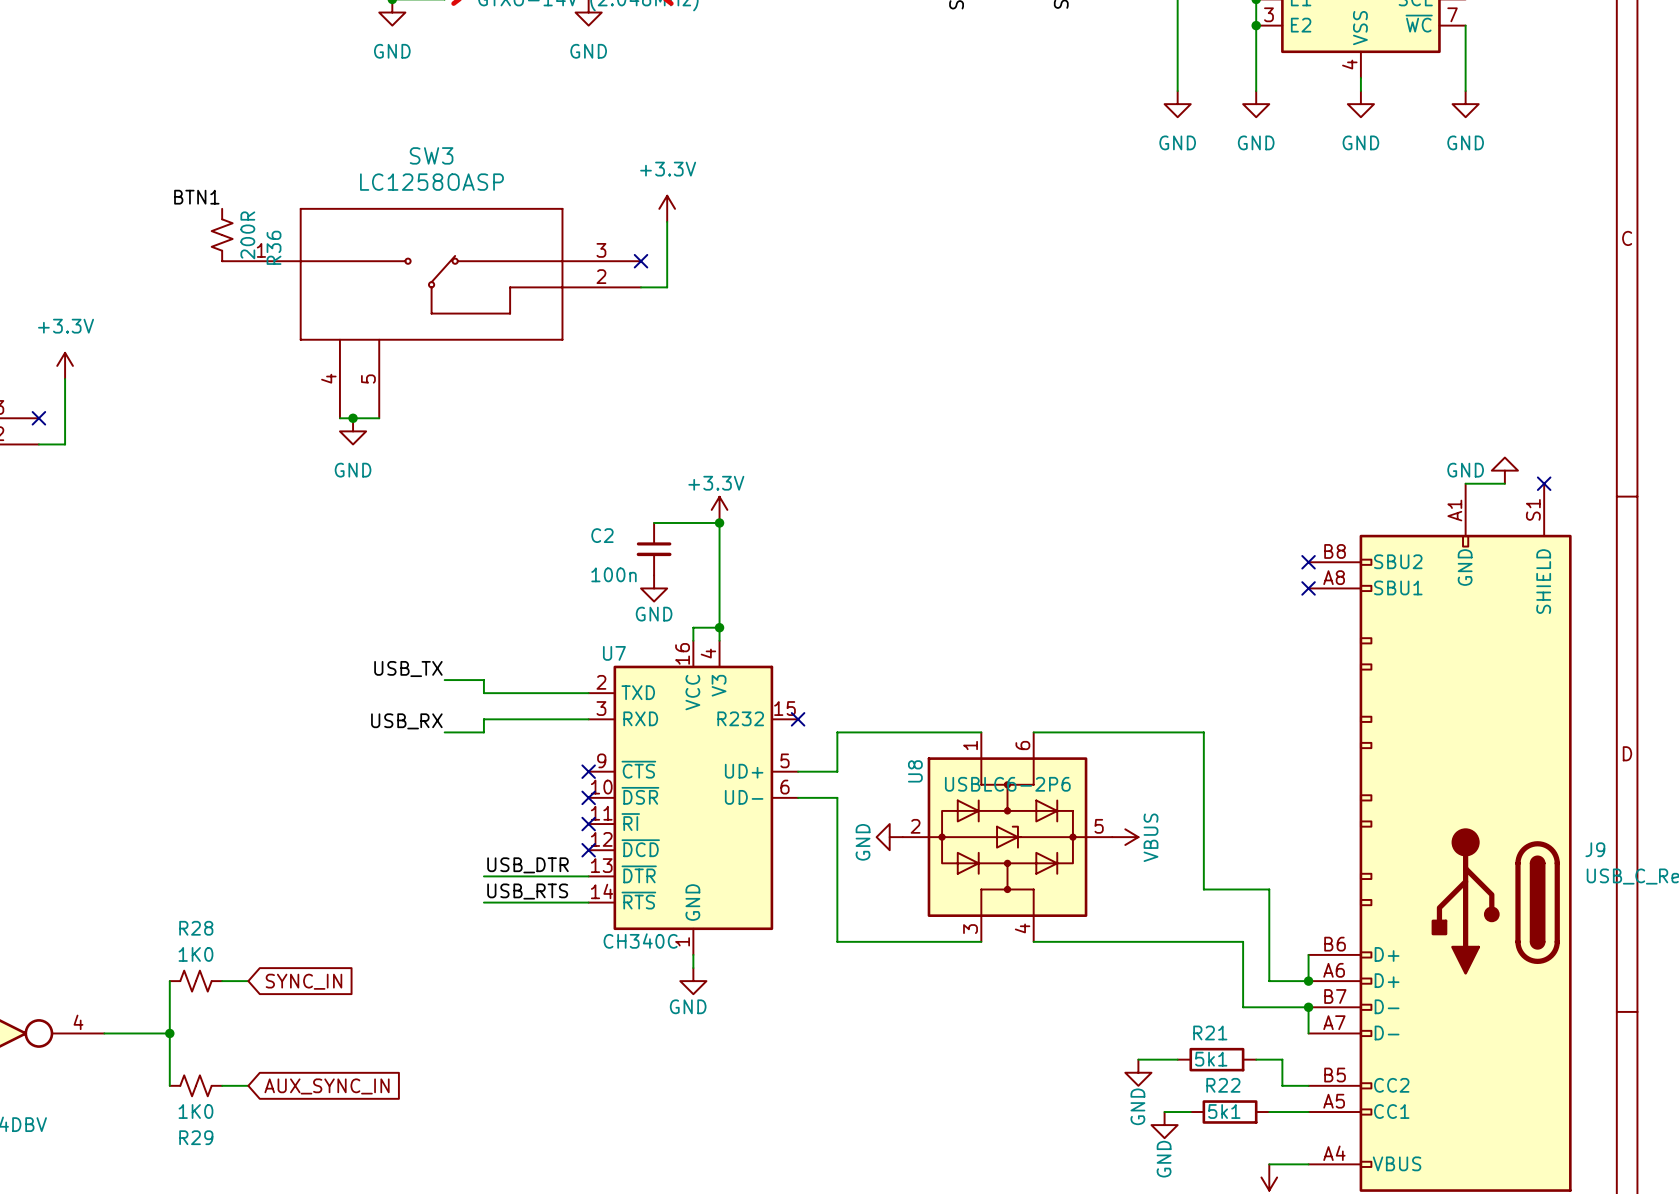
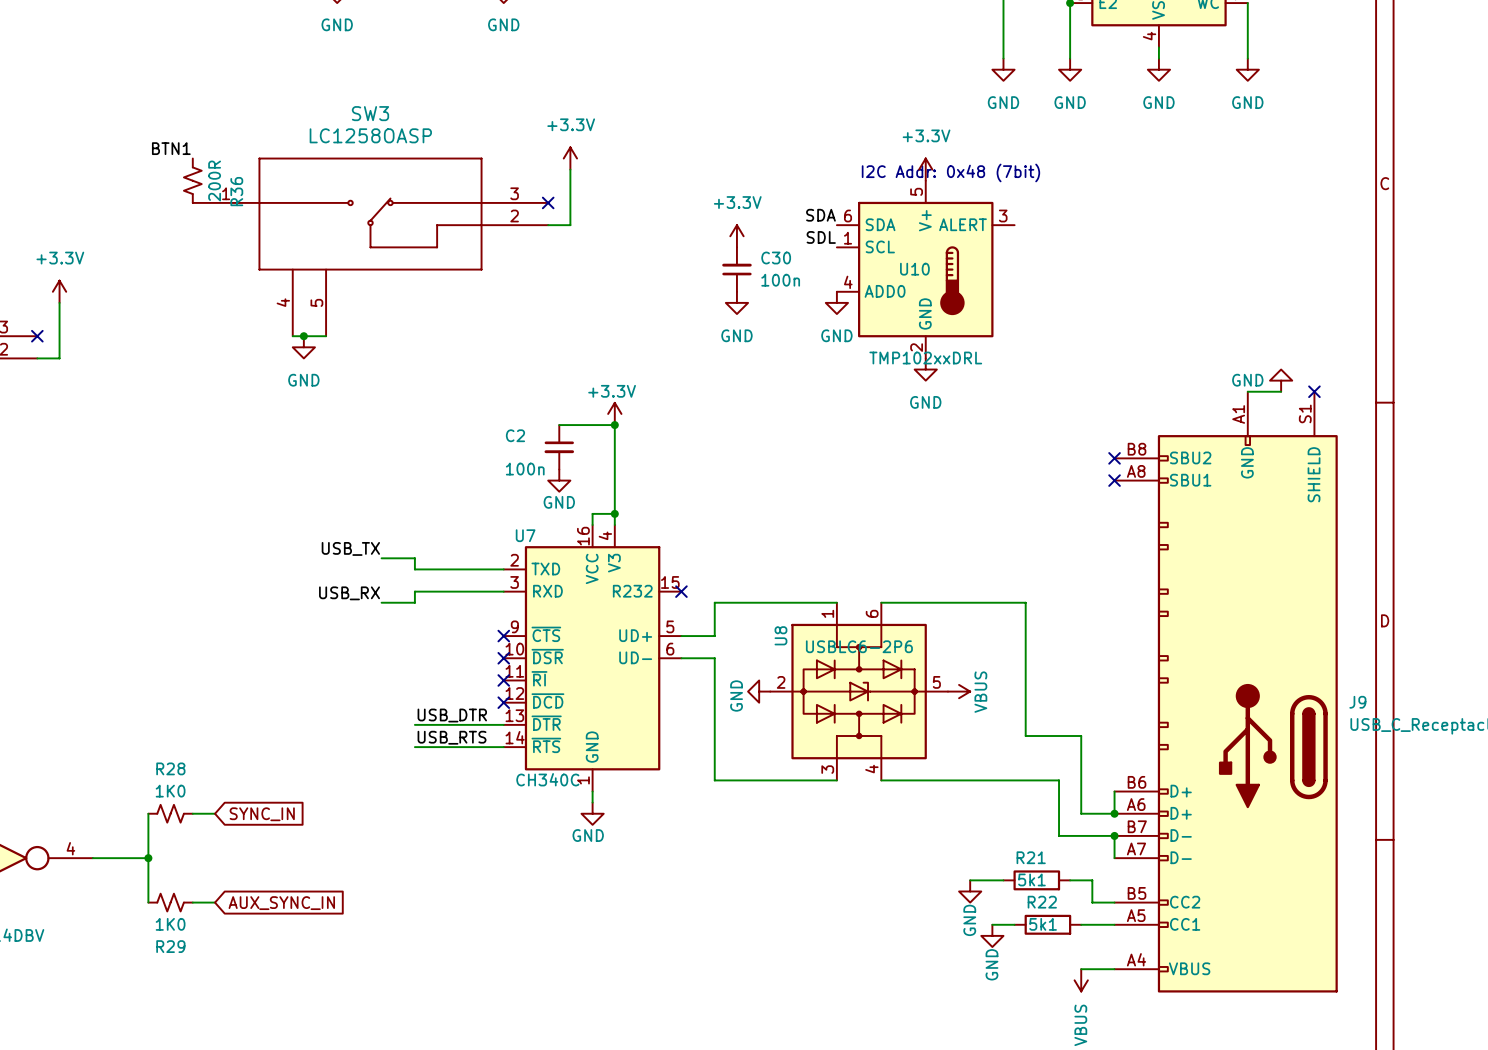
power symbol: none -> +3.3V (925, 169)
text: none -> I2C Addr: 0x48 (7bit) (950, 172)
label: none -> SDA (820, 215)
power symbol: none -> +3.3V (736, 236)
label: none -> SDL (821, 237)
C30: none -> 100n (736, 269)
U10: none -> TMP102xxDRL (925, 269)
power symbol: none -> GND (736, 302)
power symbol: none -> GND (836, 302)
power symbol: none -> GND (925, 369)

